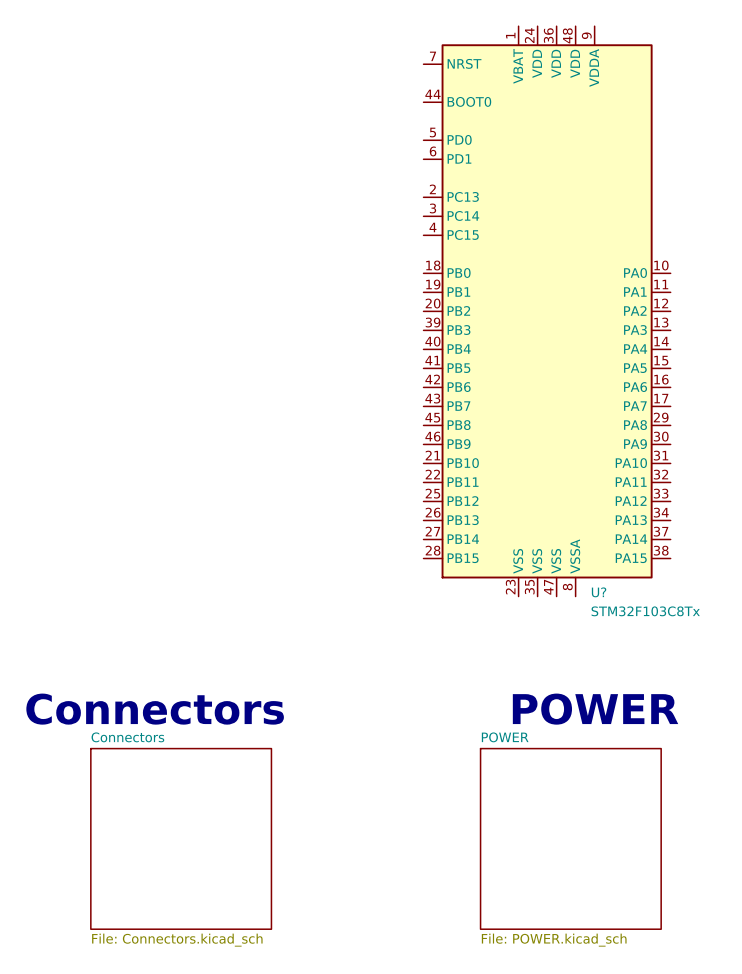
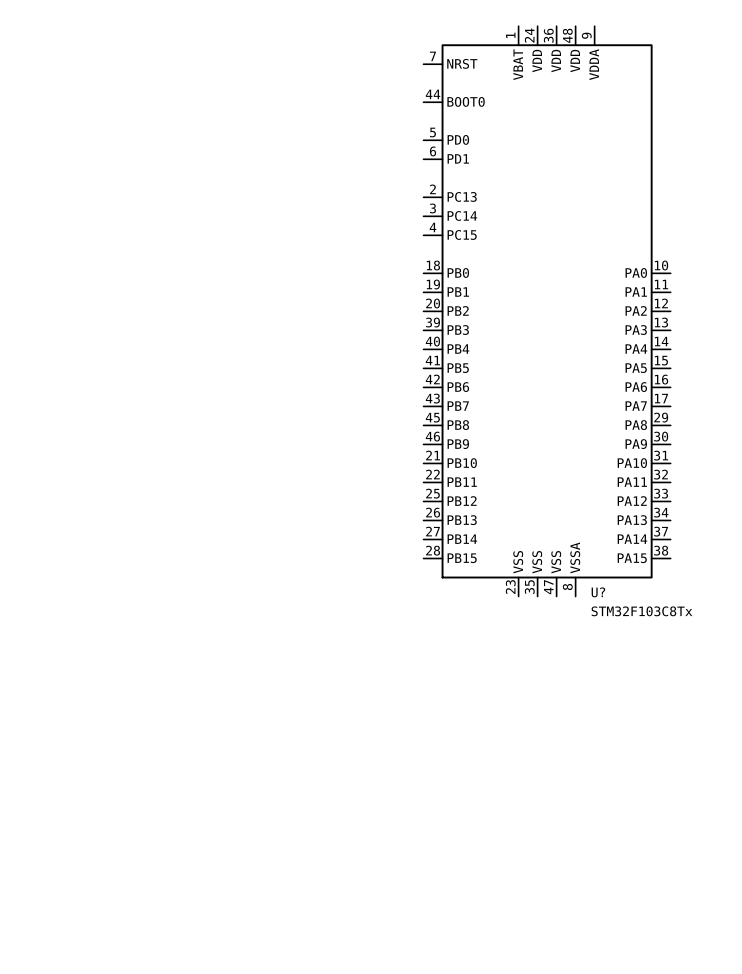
text: Connectors (155, 709) -> none
text: POWER (595, 709) -> none
sheet Connectors: File: Connectors.kicad_sch (181, 838) -> none
sheet POWER: File: POWER.kicad_sch (570, 838) -> none

